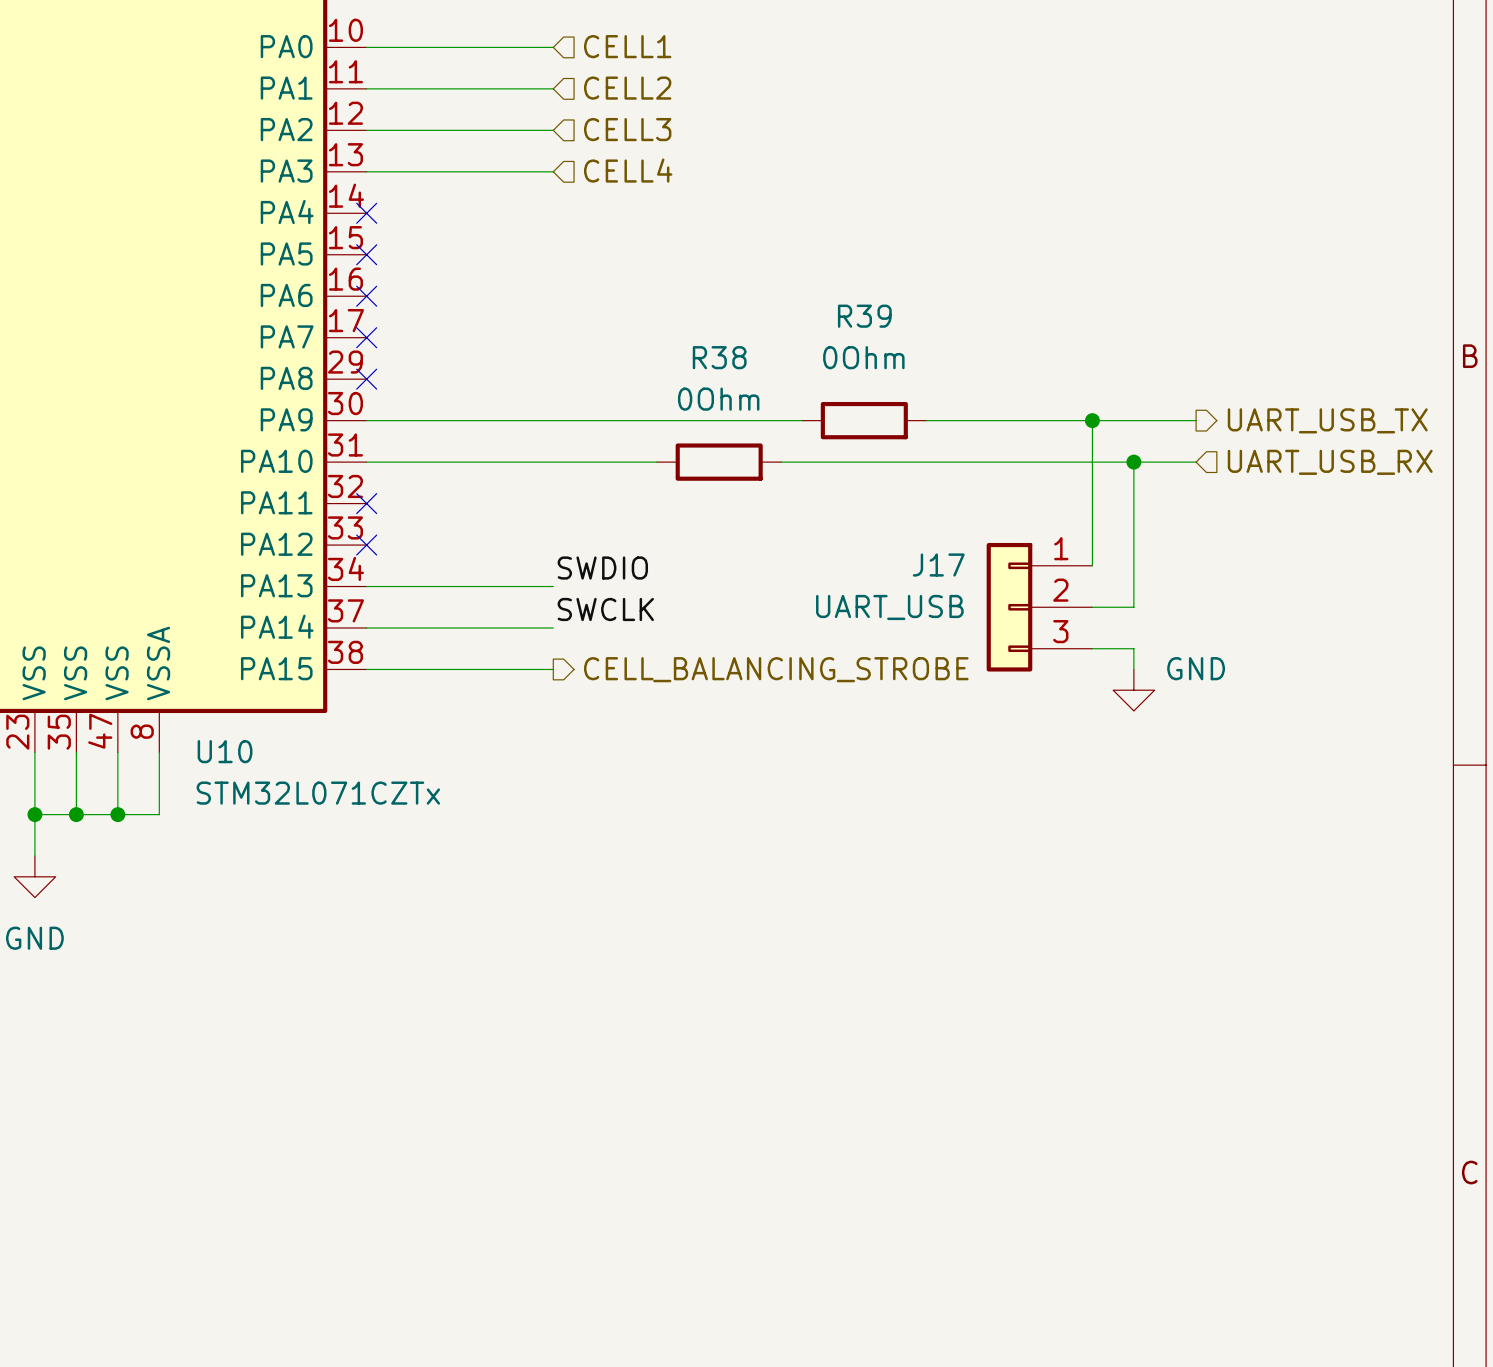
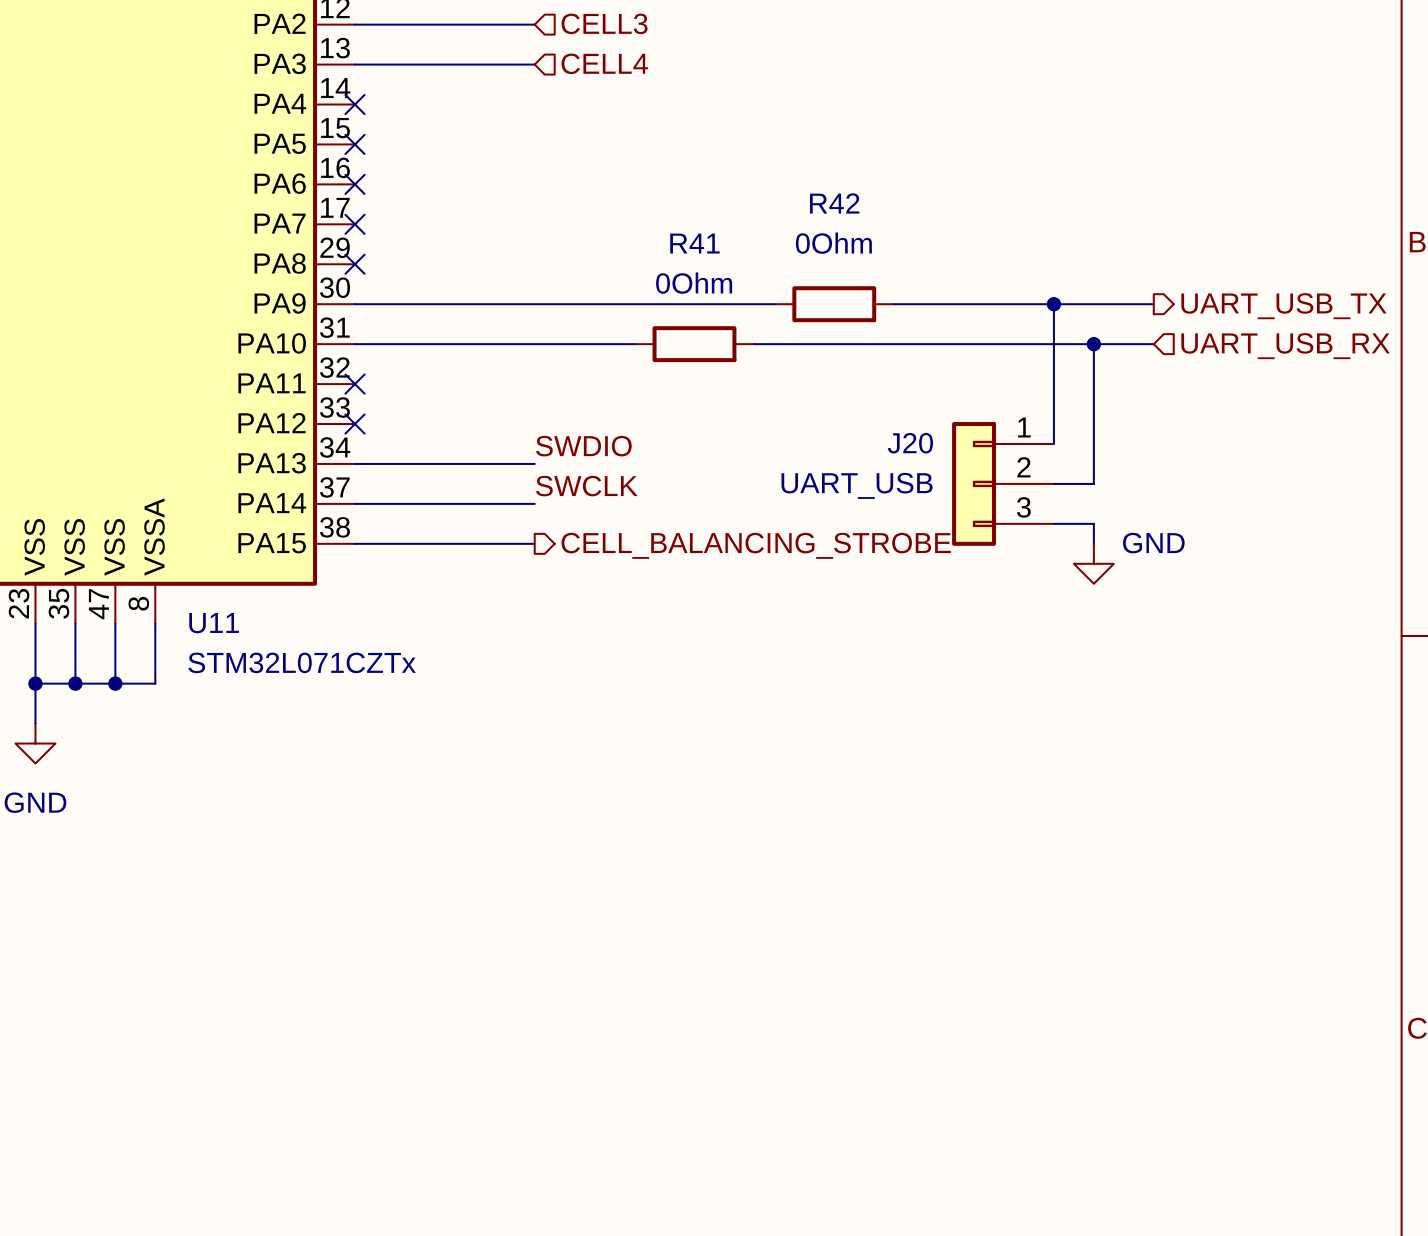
R39 name: R39 (864, 316) -> R42 (834, 203)
R38 name: R38 (719, 357) -> R41 (694, 243)
J17 name: J17 (938, 565) -> J20 (910, 443)
U10 name: U10 (225, 751) -> U11 (214, 623)

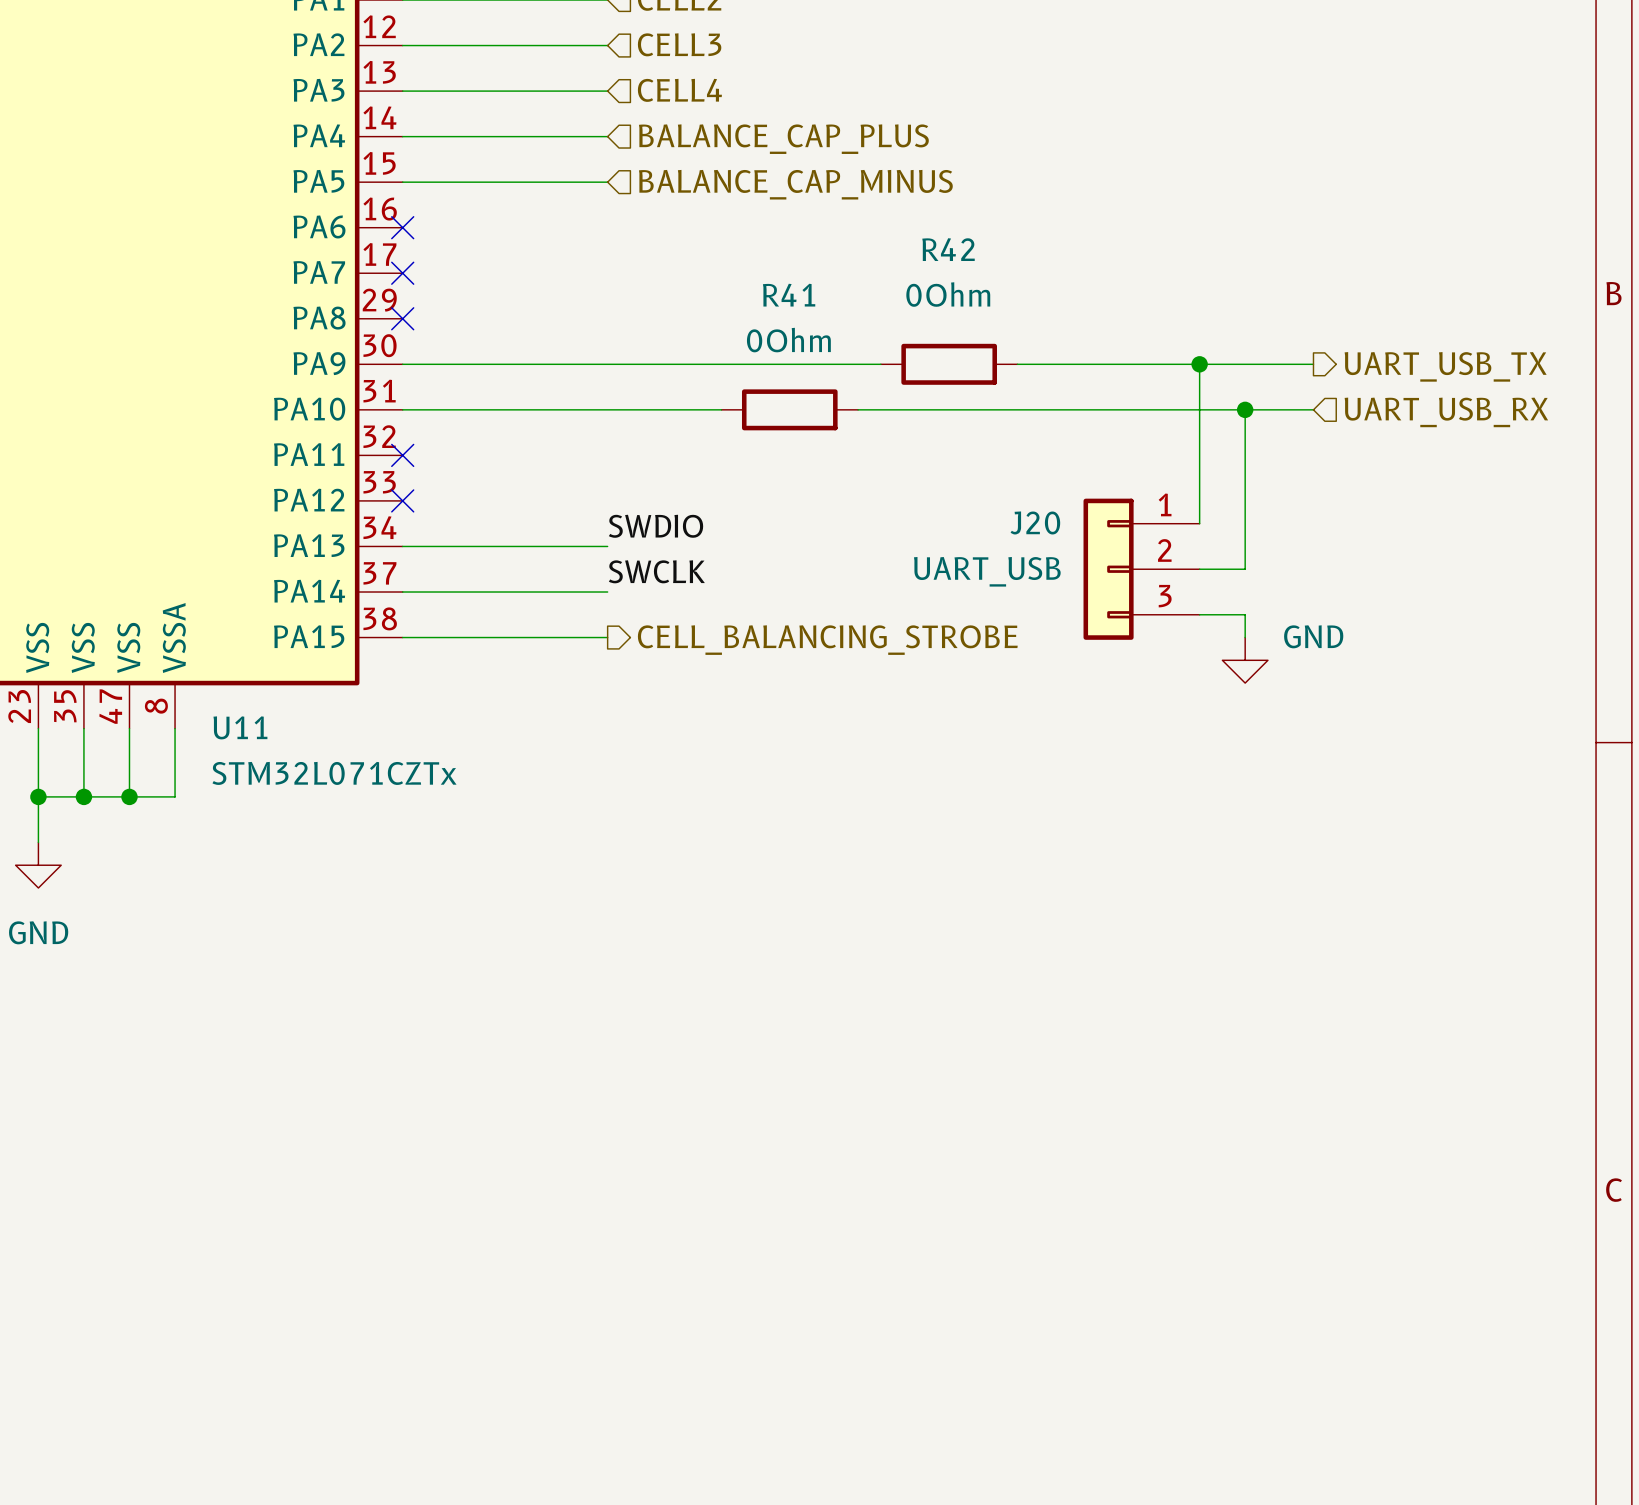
wire: none -> (402, 136) (607, 136)
no-connect mark: (354, 104) -> none
hierarchical label: none -> BALANCE_CAP_PLUS (783, 139)
wire: none -> (402, 182) (607, 182)
no-connect mark: (354, 144) -> none
hierarchical label: none -> BALANCE_CAP_MINUS (795, 184)

